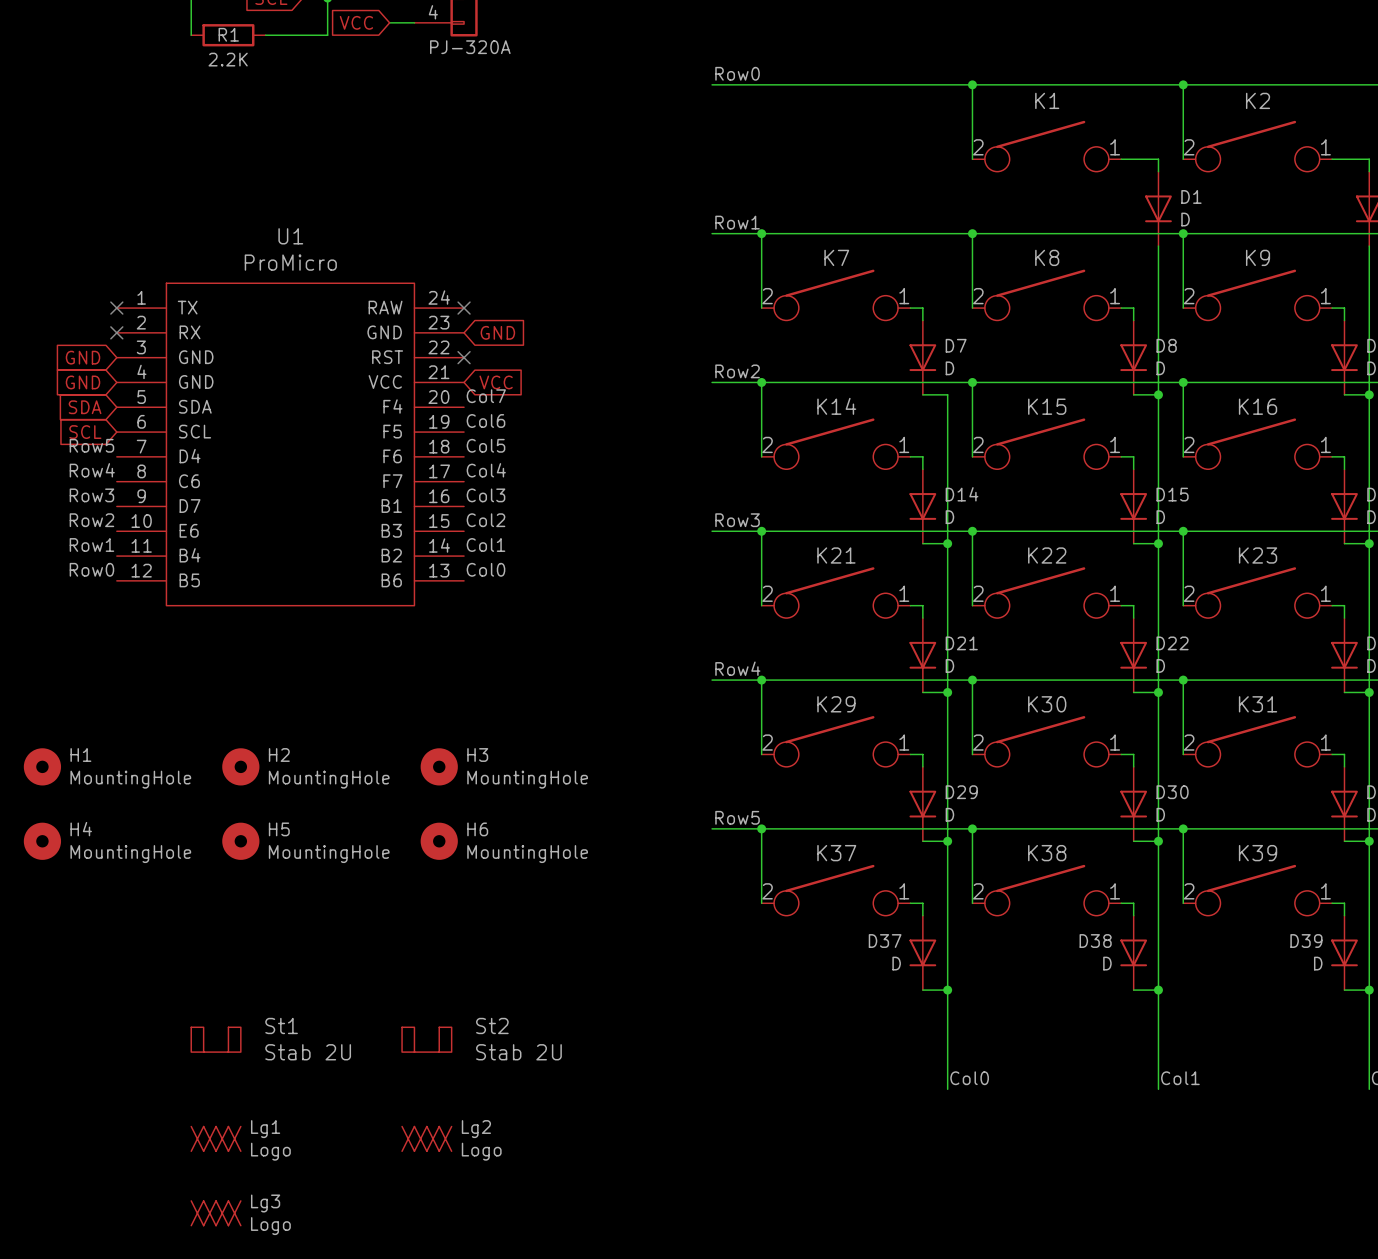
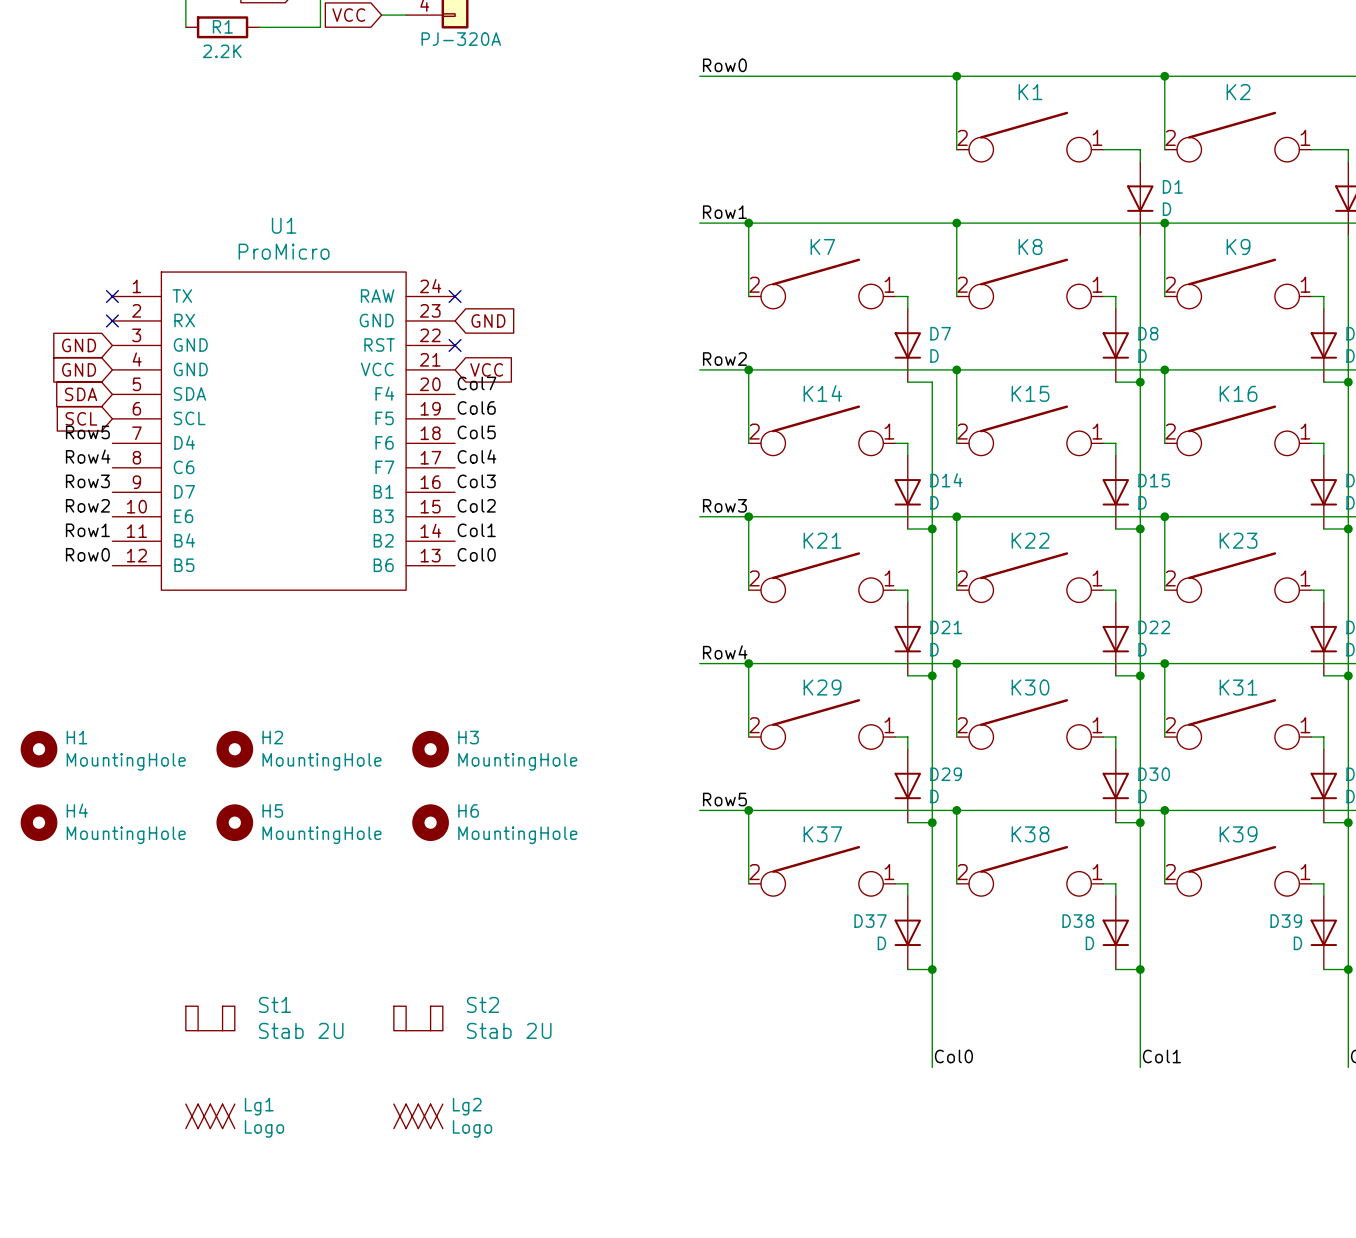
Lg3: Logo (216, 1213) -> none

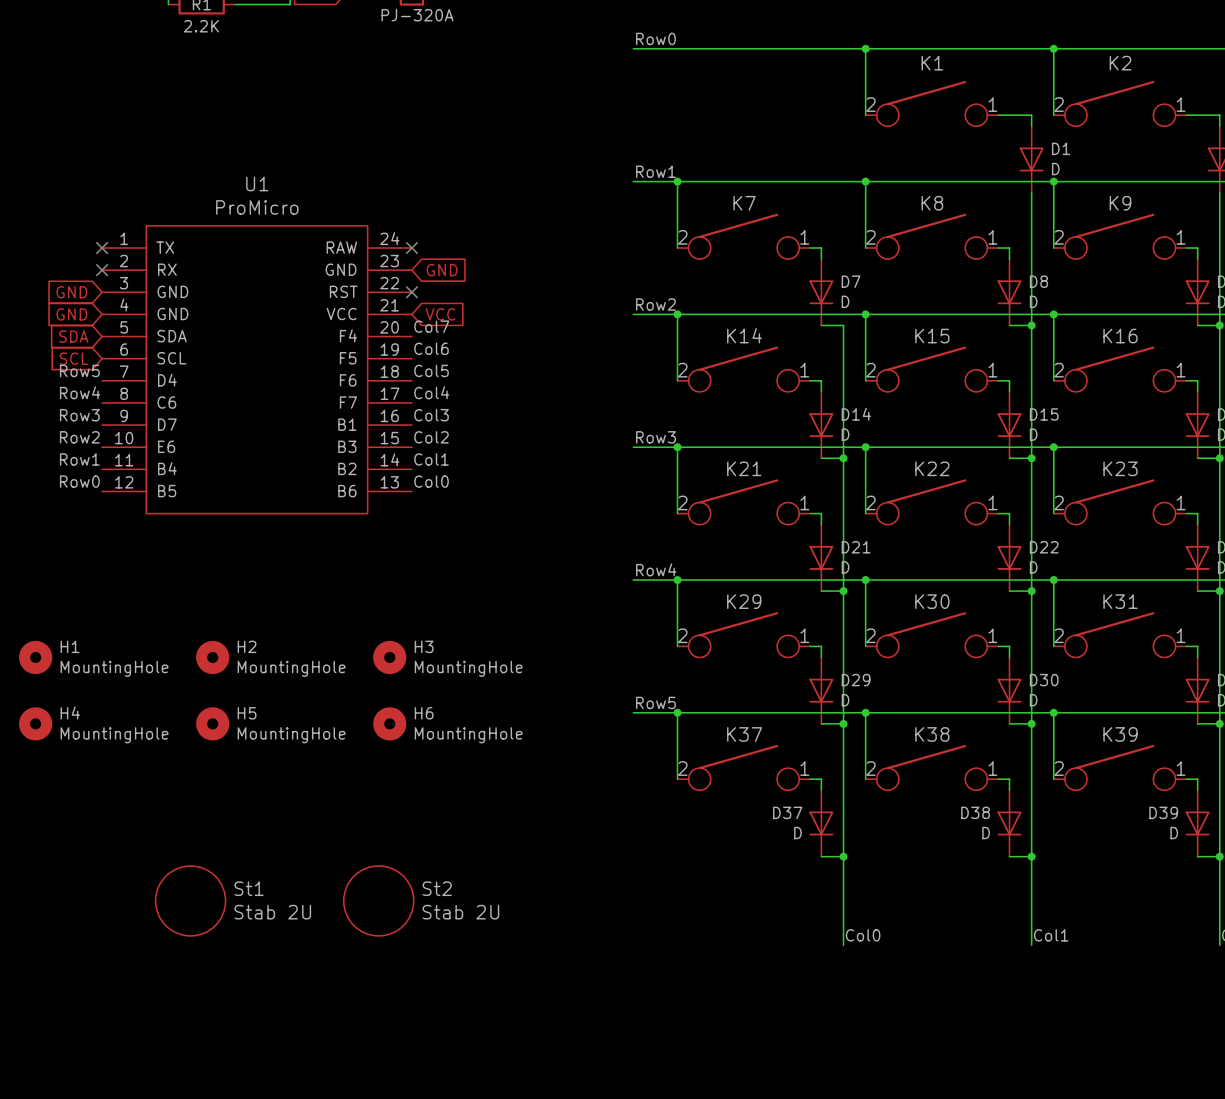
St1 symbol: [185, 1006, 235, 1031] -> [155, 865, 226, 936]
St2 symbol: [393, 1006, 443, 1031] -> [343, 865, 414, 936]
Lg1: Logo (210, 1116) -> none
Lg2: Logo (418, 1116) -> none

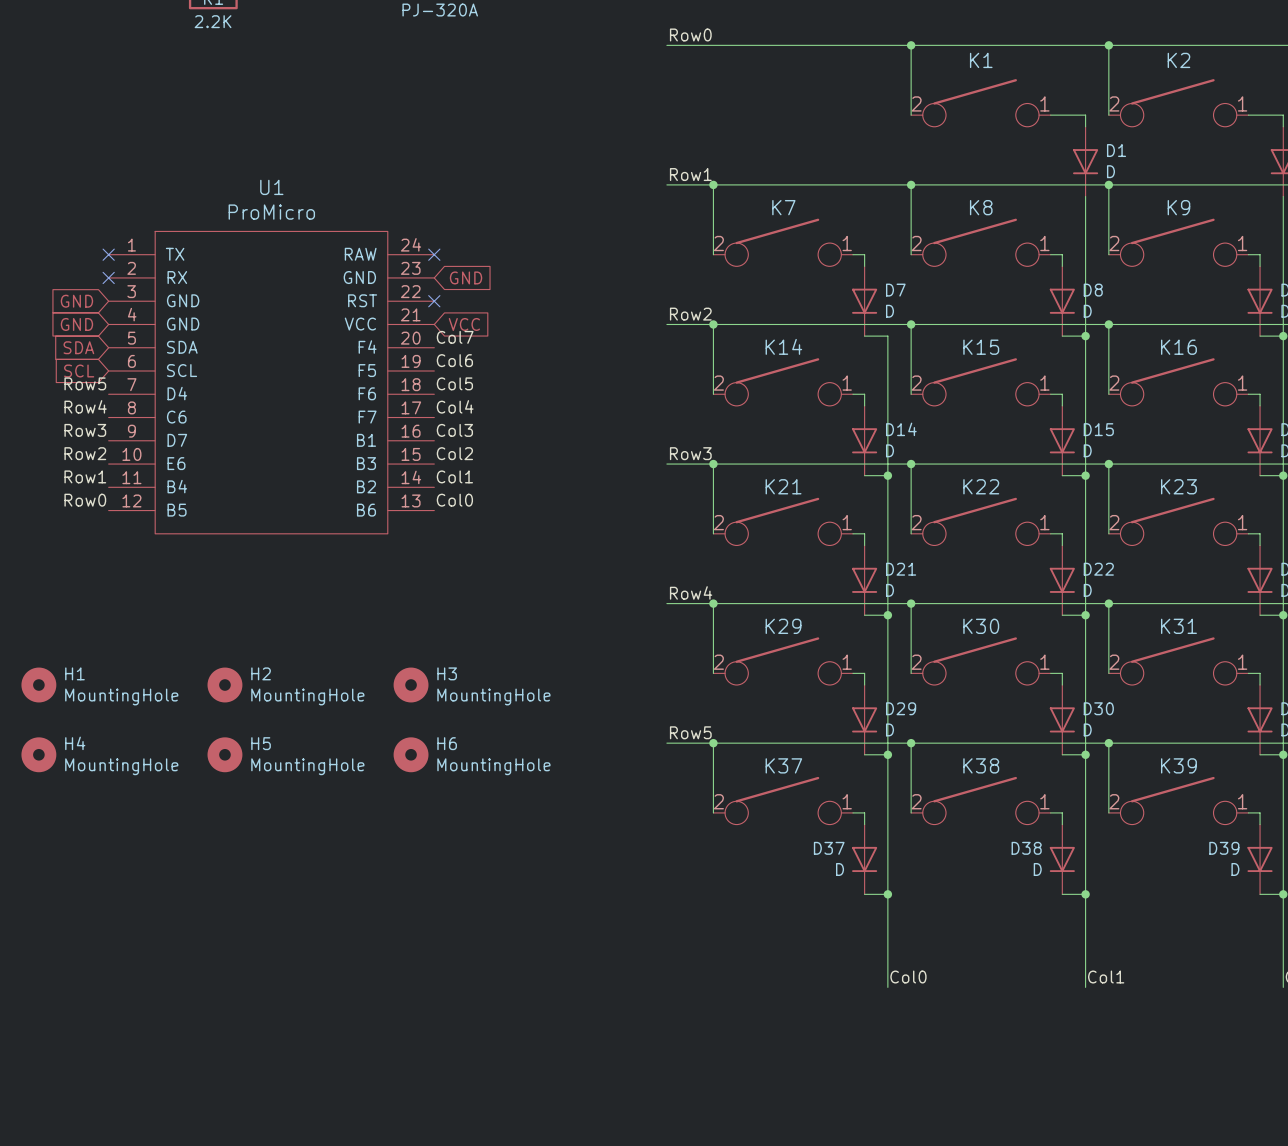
St1: Stab 2U (190, 900) -> none
St2: Stab 2U (378, 900) -> none

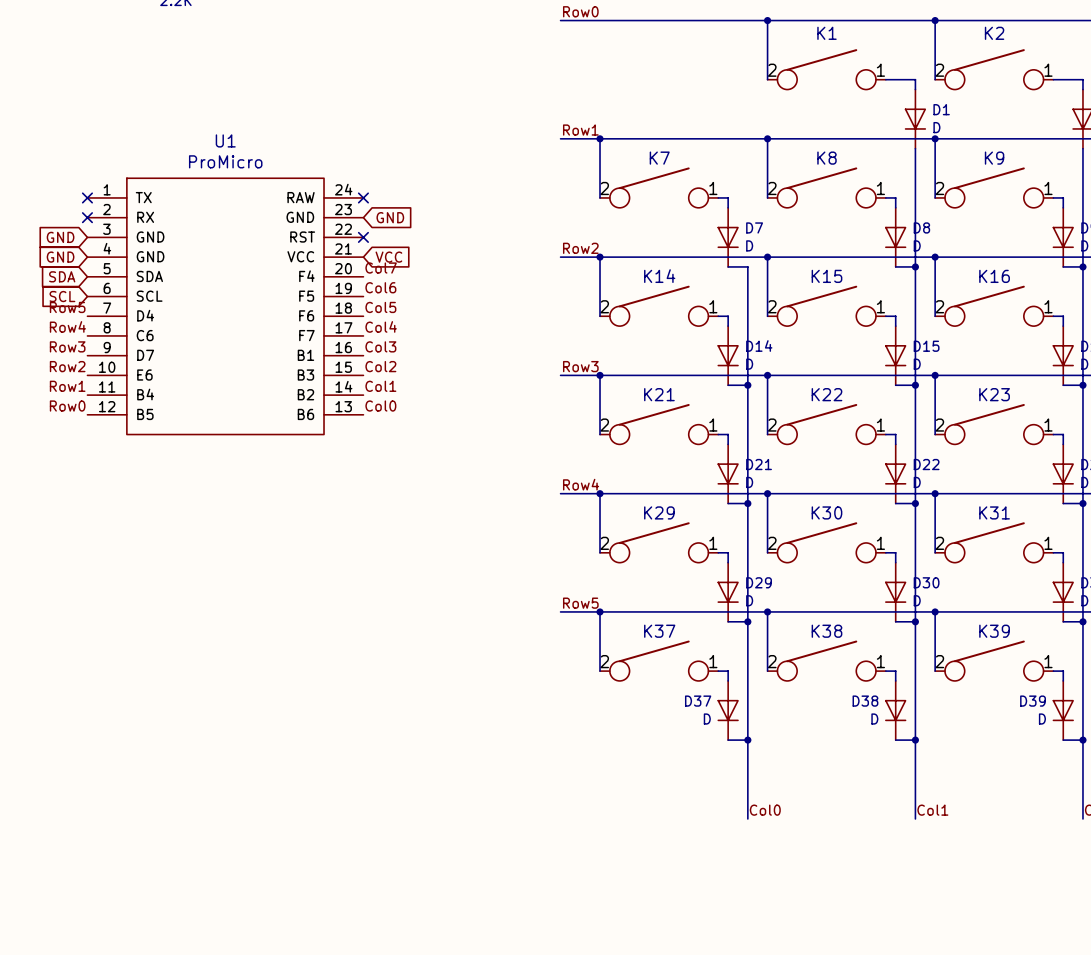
H1: MountingHole (38, 685) -> none
H2: MountingHole (224, 685) -> none
H3: MountingHole (411, 685) -> none
H4: MountingHole (38, 754) -> none
H5: MountingHole (224, 754) -> none
H6: MountingHole (411, 754) -> none

